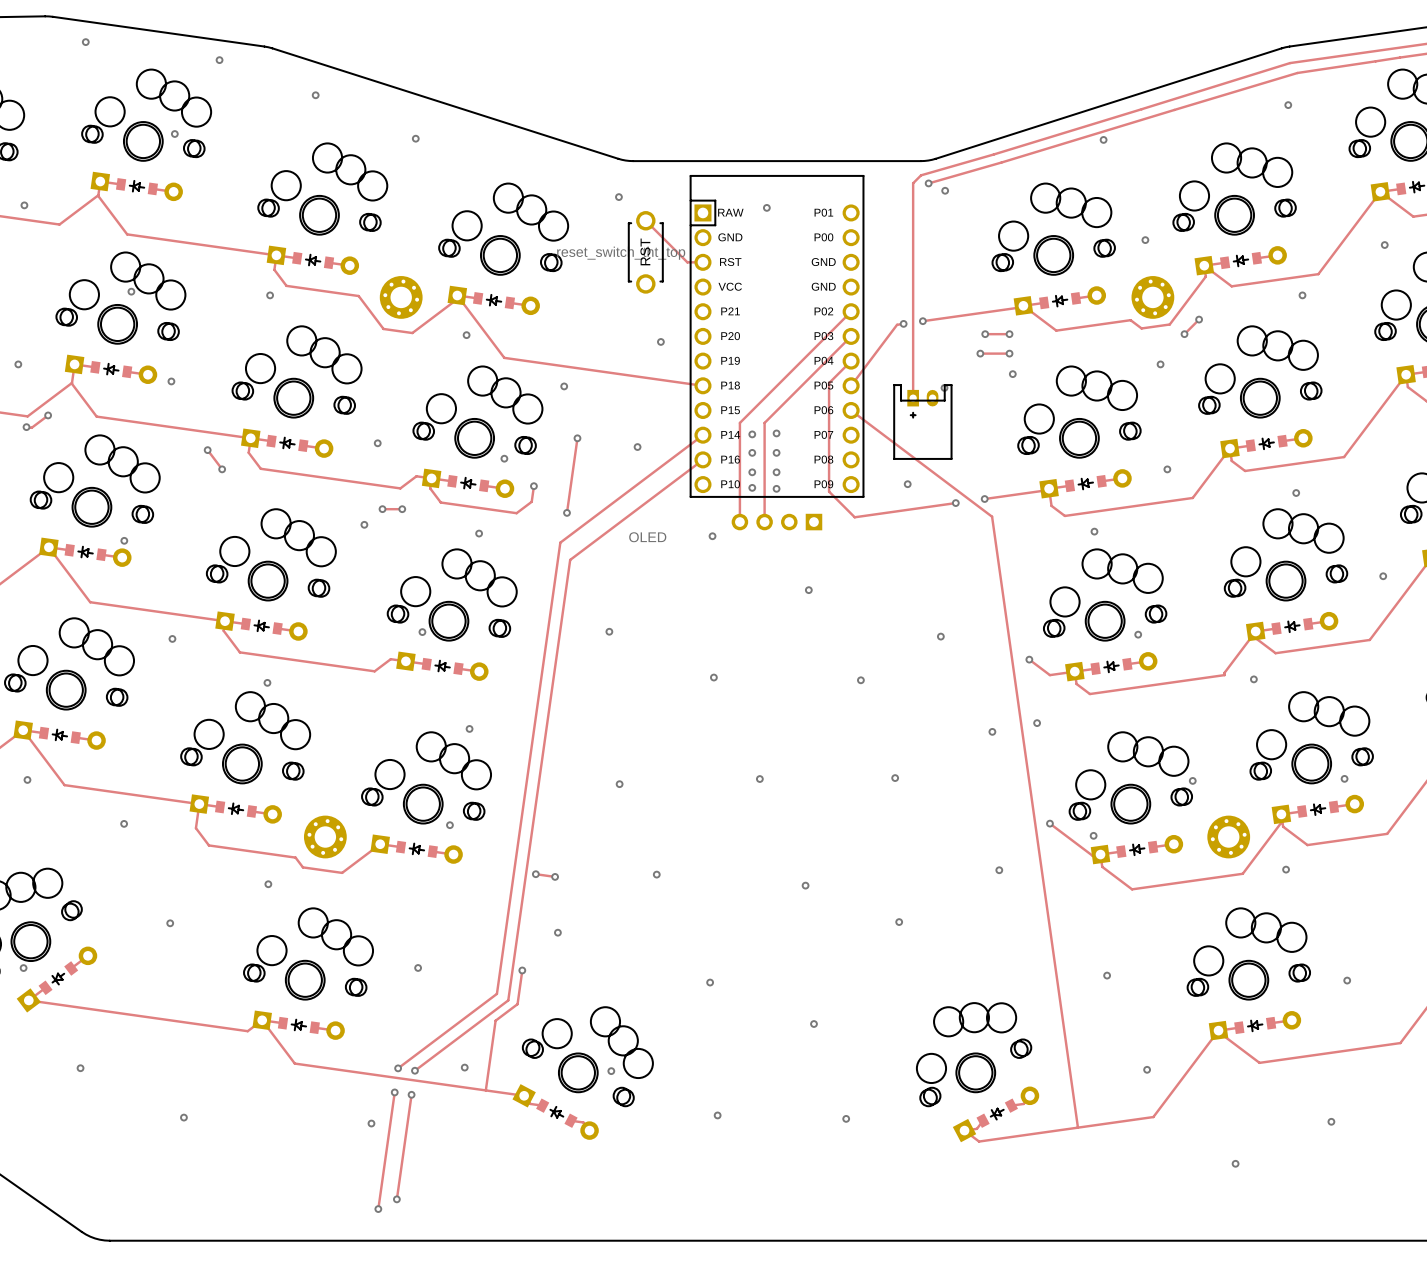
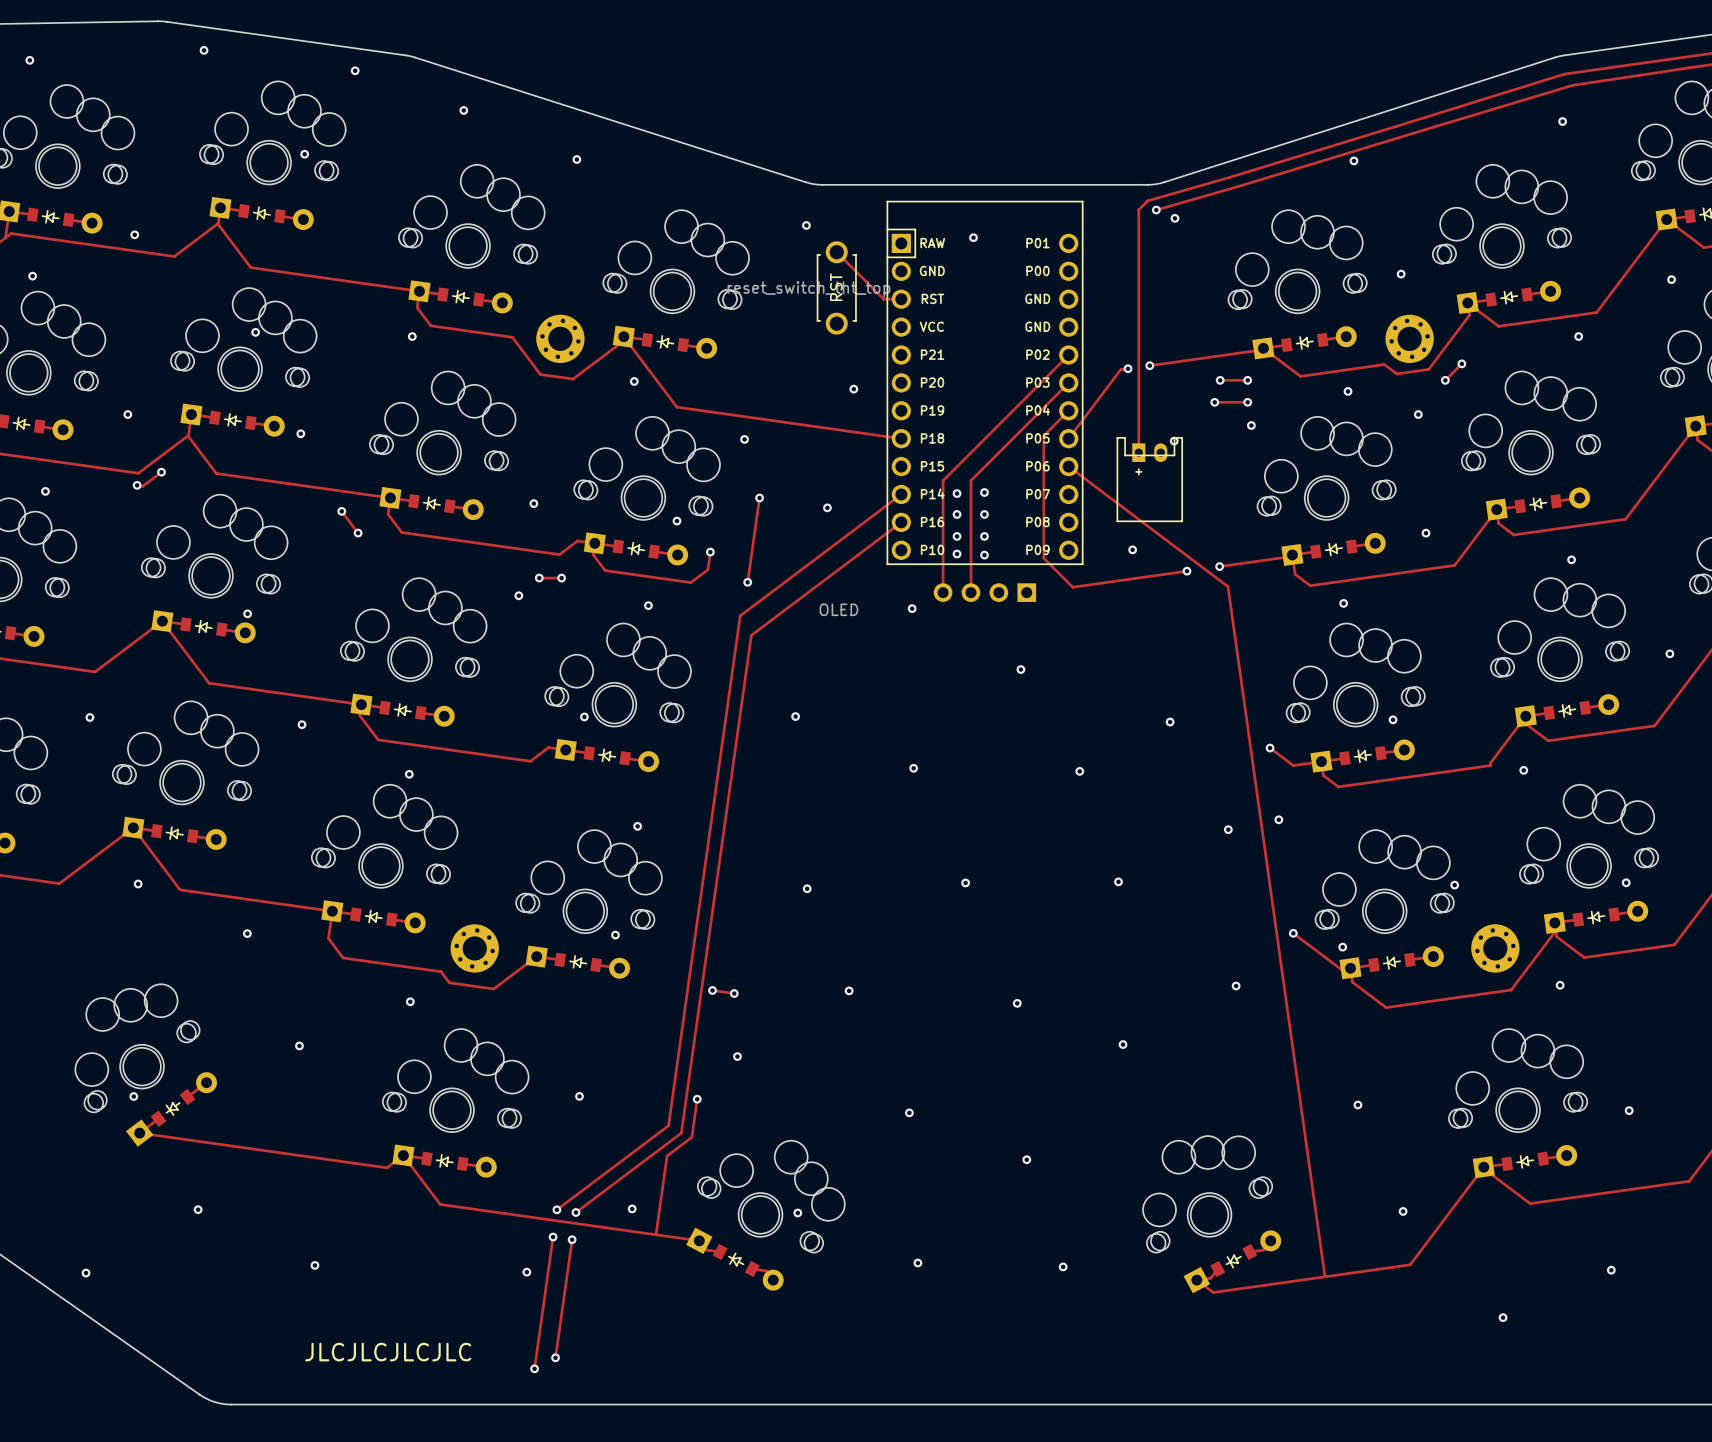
via: none -> (1348, 391)
text: none -> JLCJLCJLCJLC (388, 1352)

